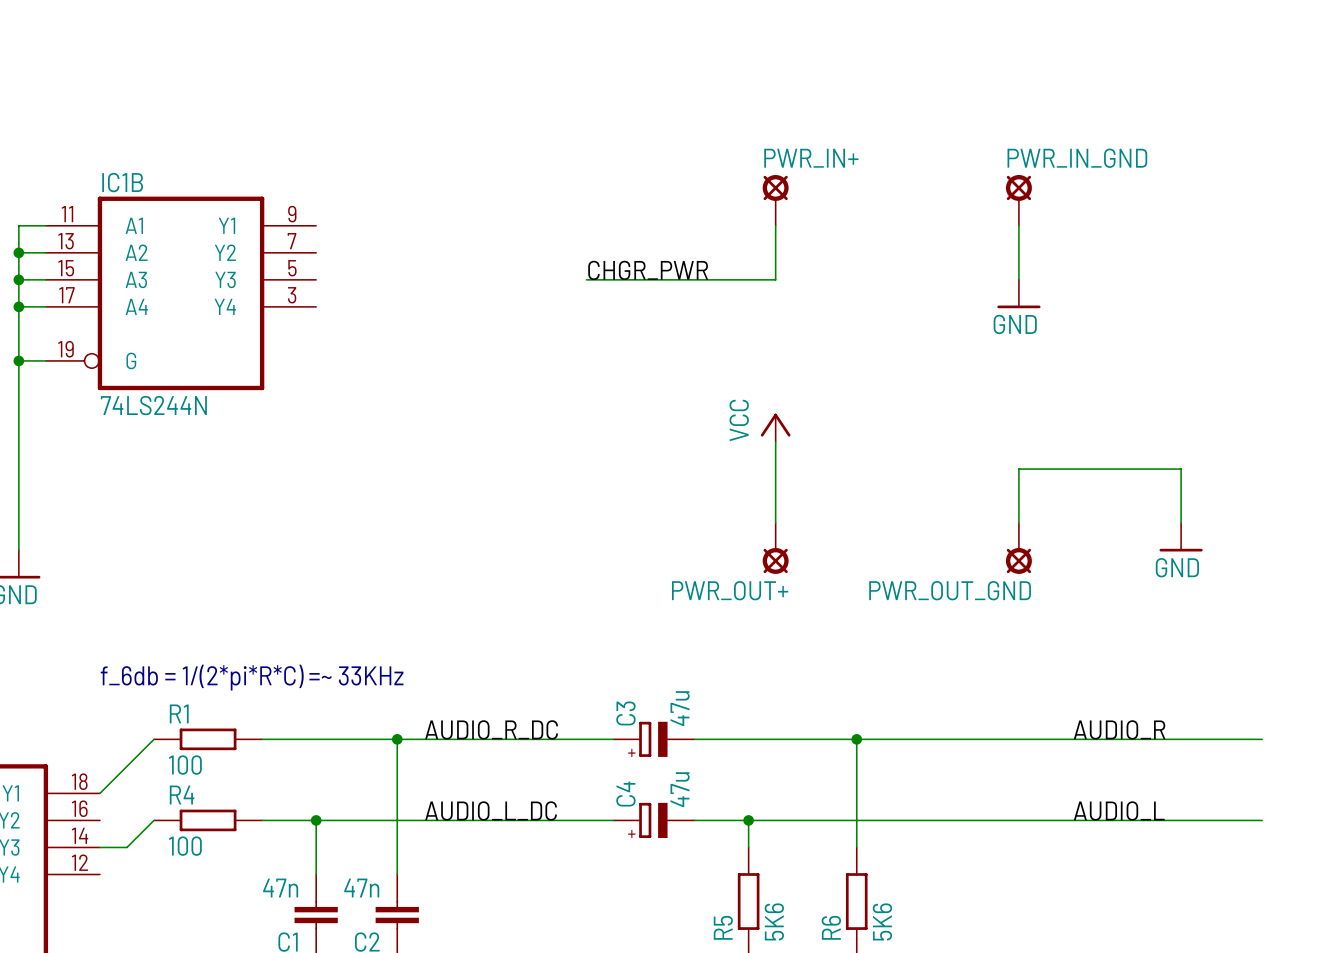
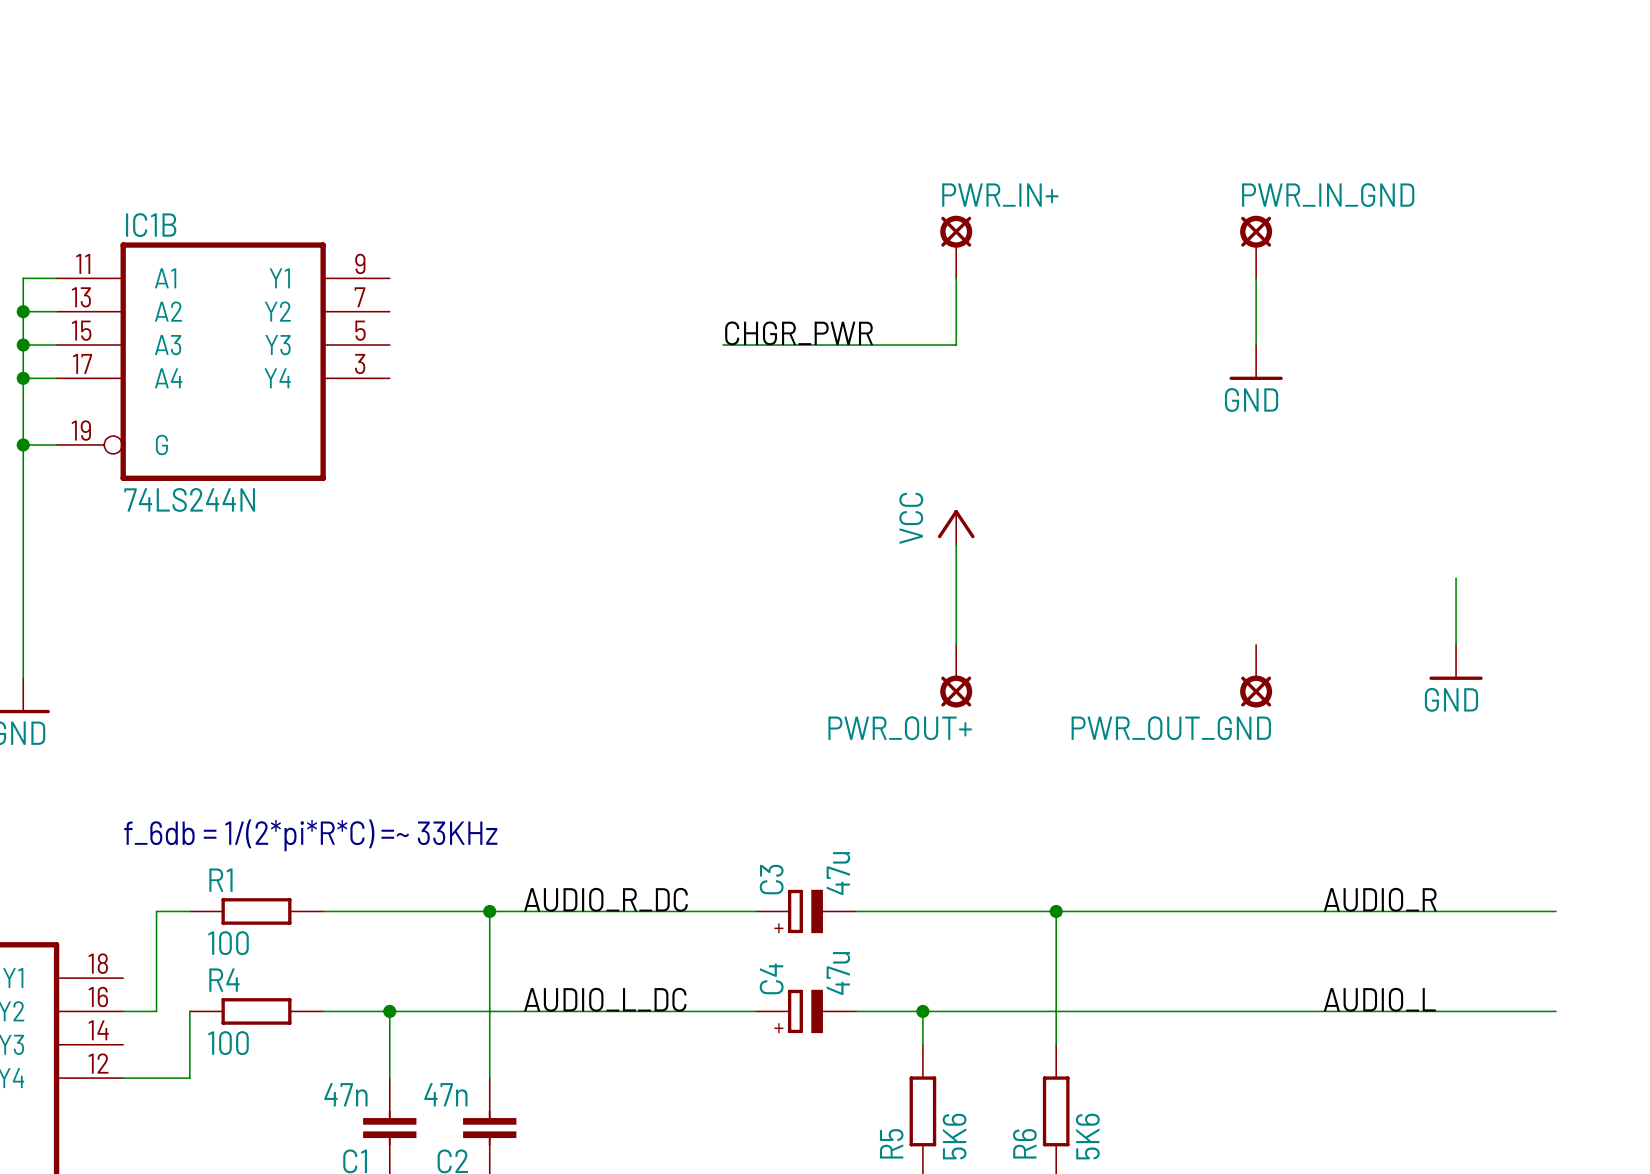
wire: (1181, 469) (1018, 469) (1018, 523) -> none
wire: (154, 739) (99, 793) -> (189, 911) (156, 911) (156, 1011) (123, 1011)
wire: (154, 820) (126, 847) (99, 847) -> (189, 1011) (189, 1078) (123, 1078)

